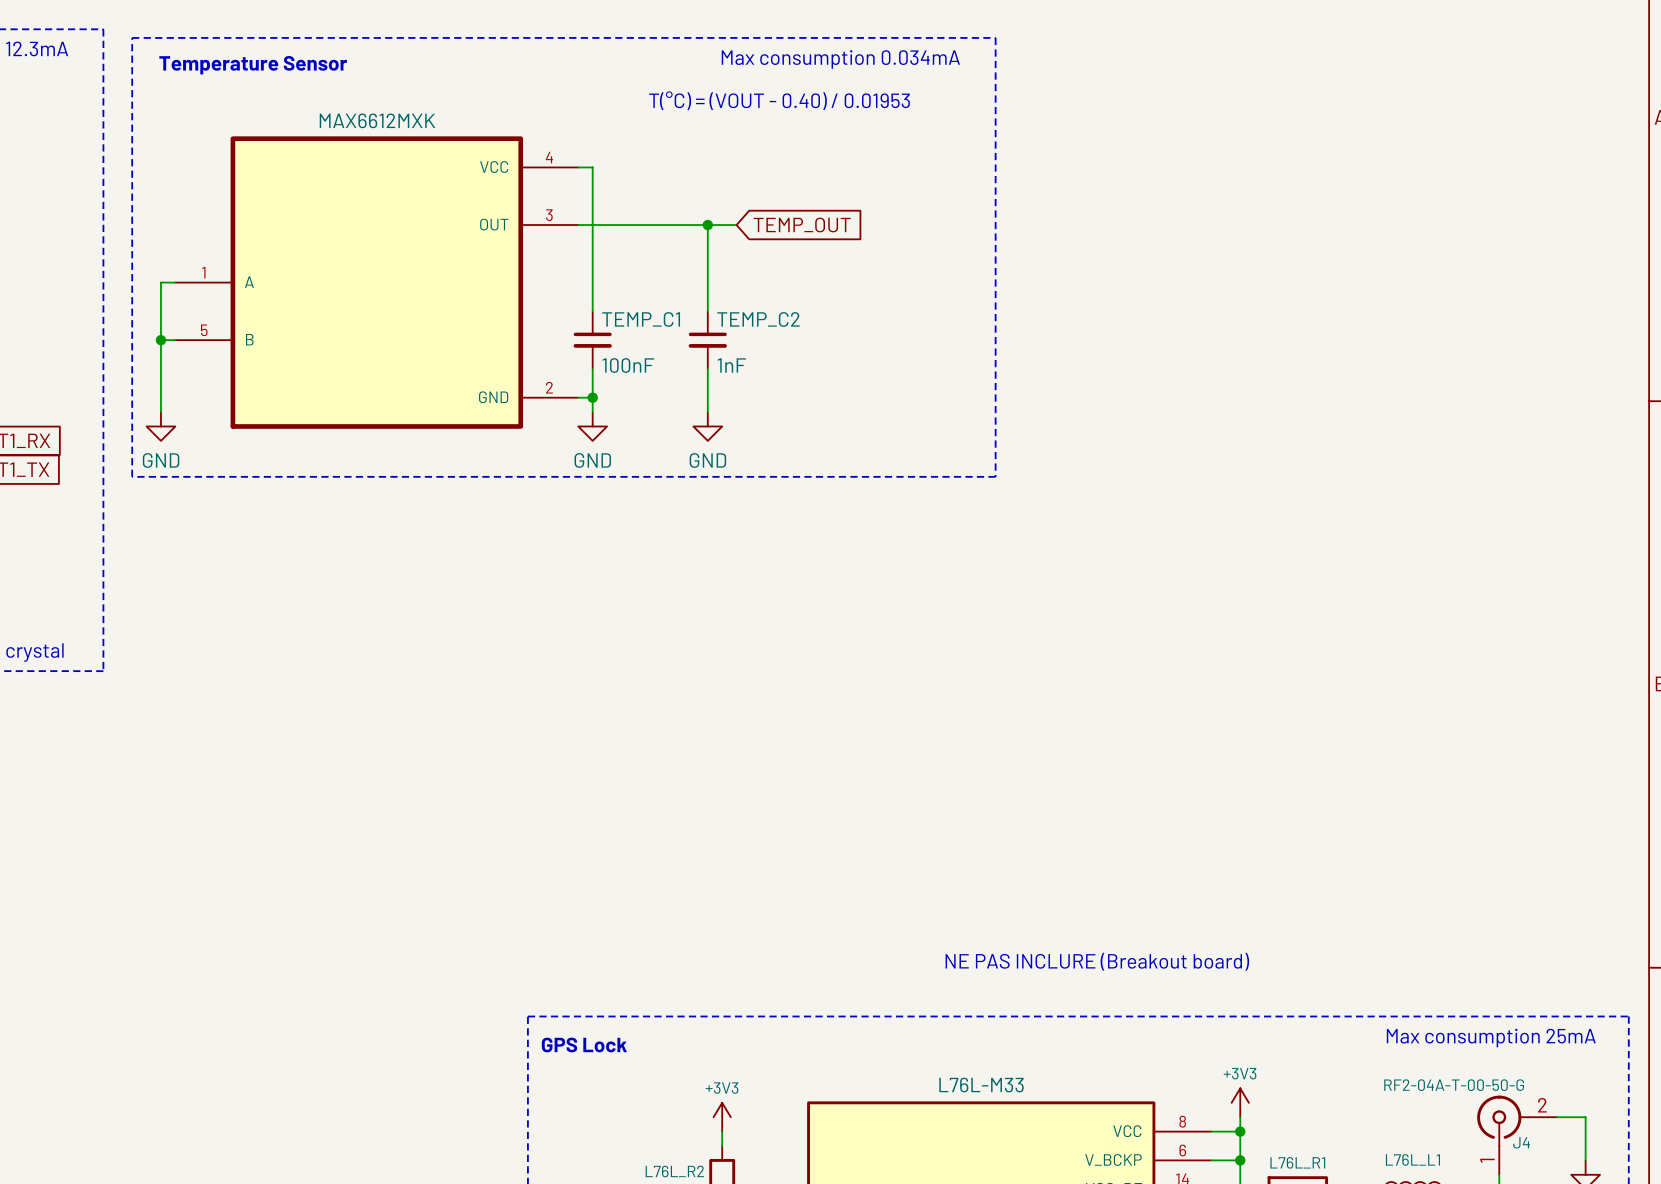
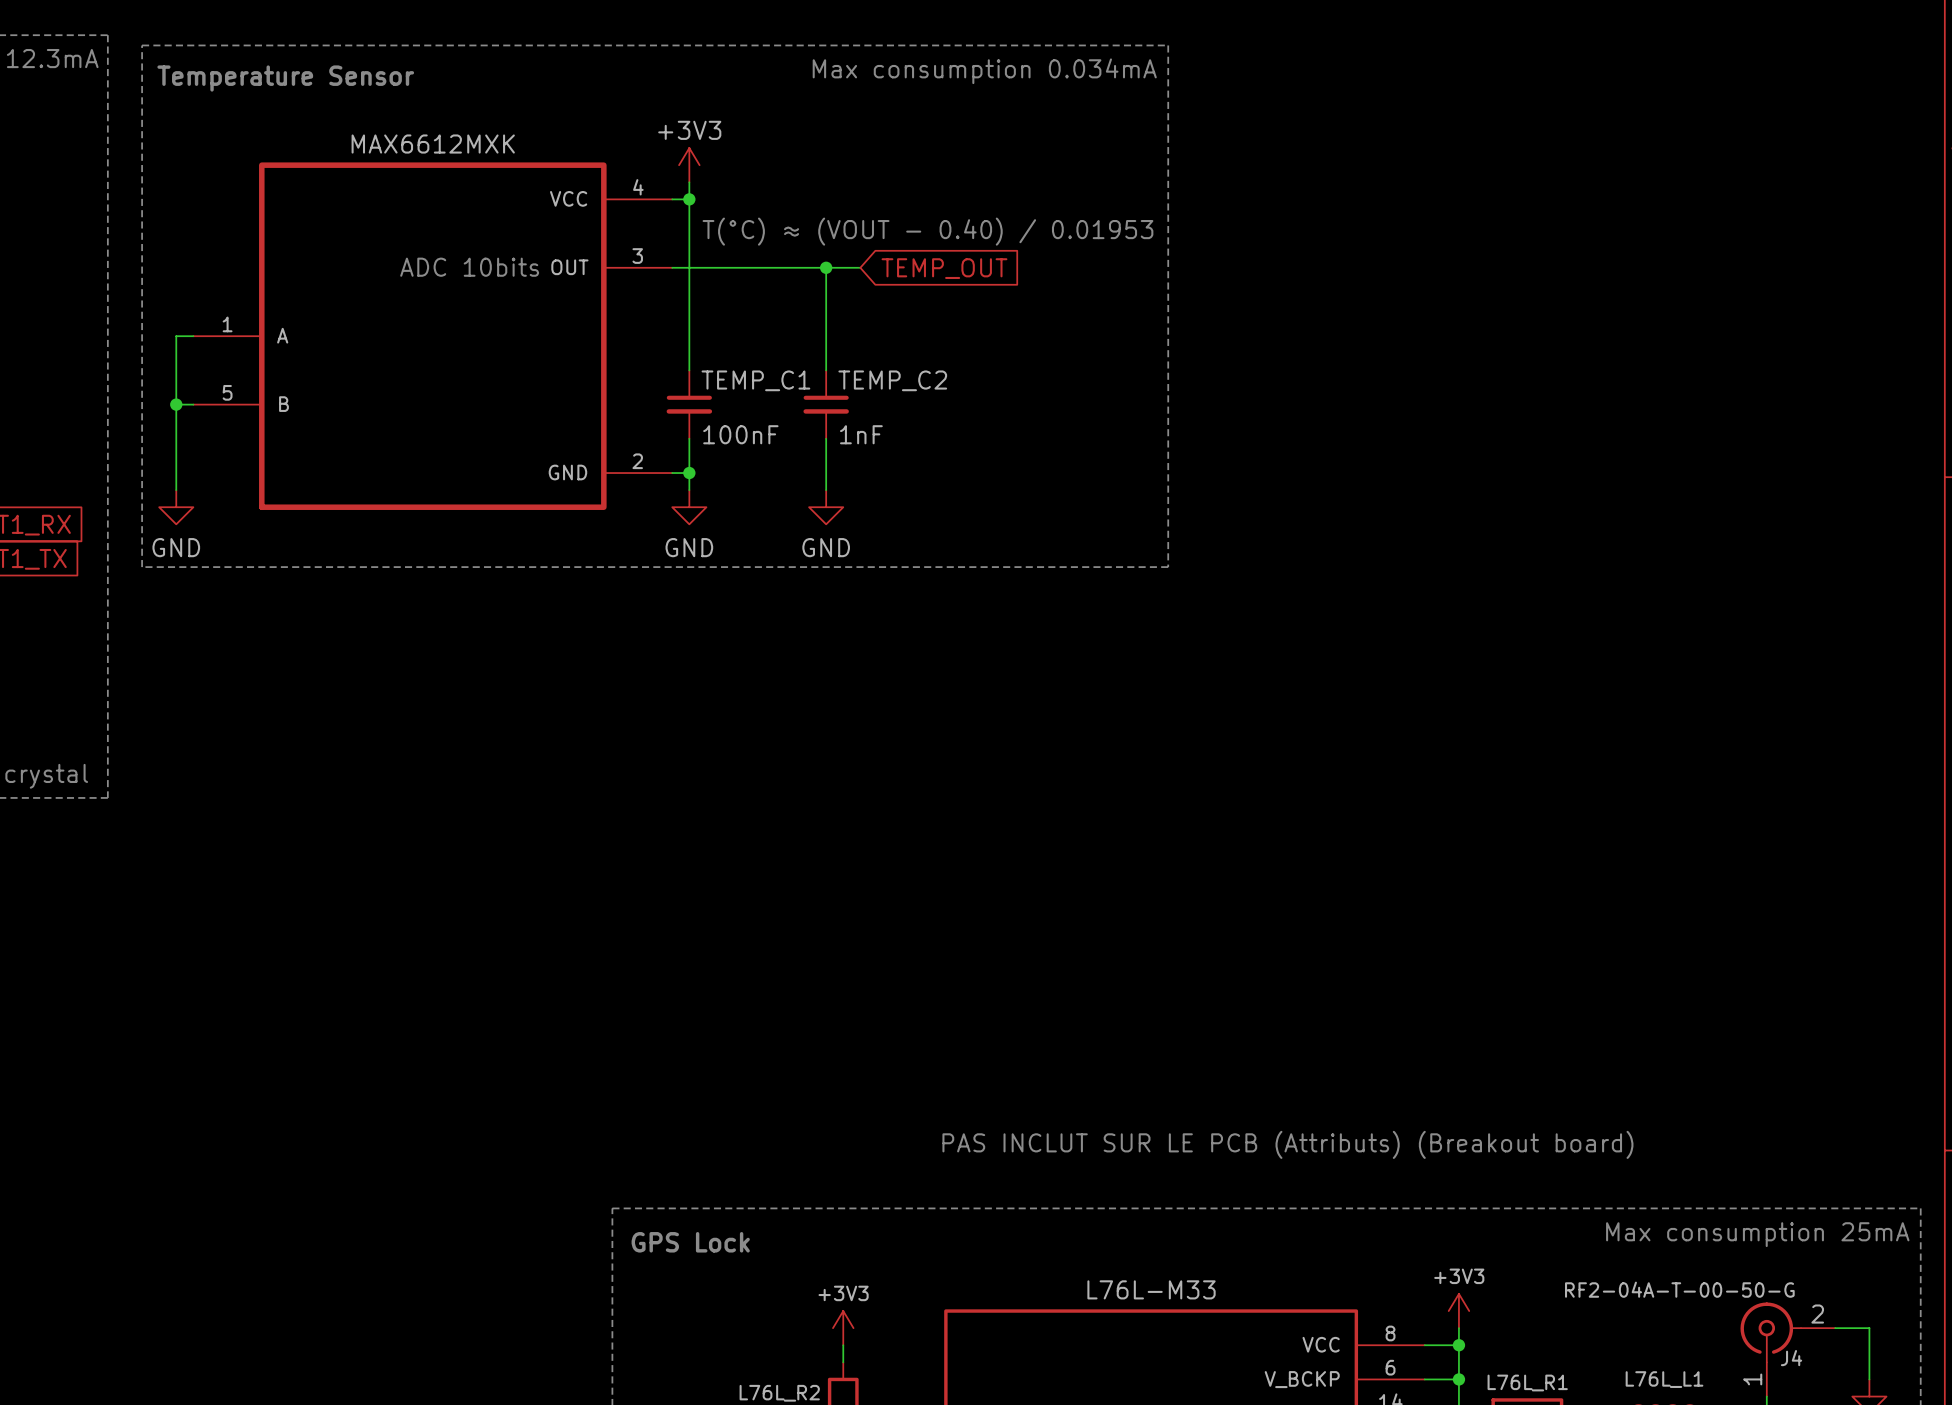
text: T(°C) = (VOUT - 0.40) / 0.01953 (779, 100) -> none
power symbol: none -> +3V3 (689, 165)
wire: none -> (689, 182) (689, 199)
junction: none -> (689, 199)
text: none -> T(°C) ≈ (VOUT - 0.40) / 0.01953 (927, 231)
text: none -> ADC 10bits (469, 267)
text: NE PAS INCLURE (Breakout board) (1097, 961) -> PAS INCLUT SUR LE PCB (Attributs) (Breakout board) (1287, 1144)

